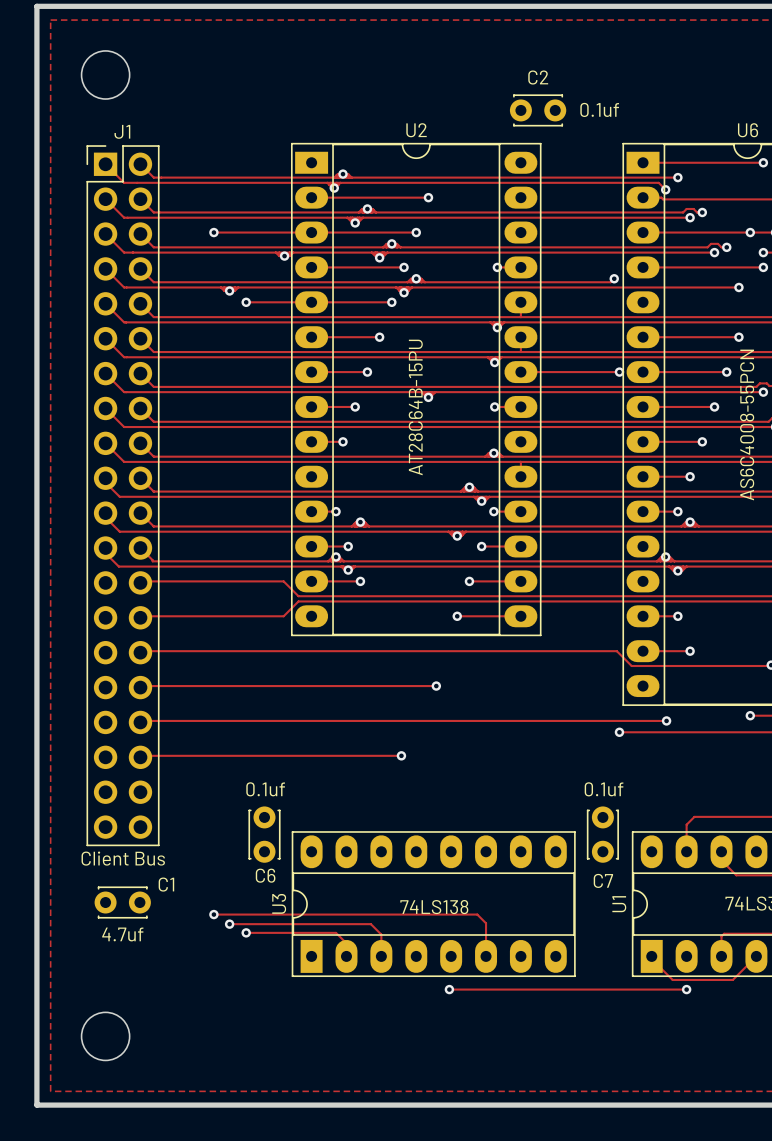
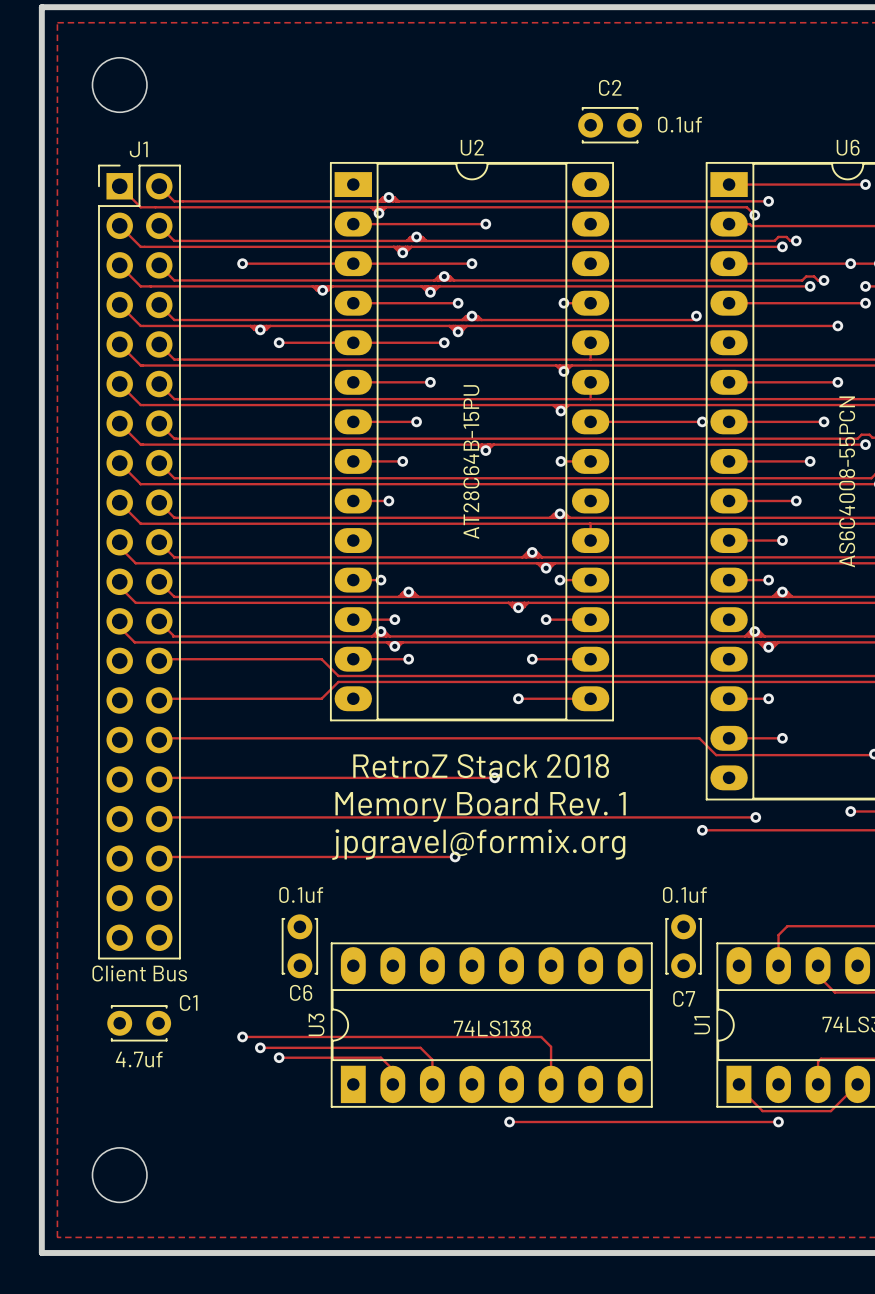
text: none -> RetroZ Stack 2018 (481, 766)
text: none -> Memory Board Rev. 1 (480, 807)
text: none -> jpgravel@formix.org (478, 844)

